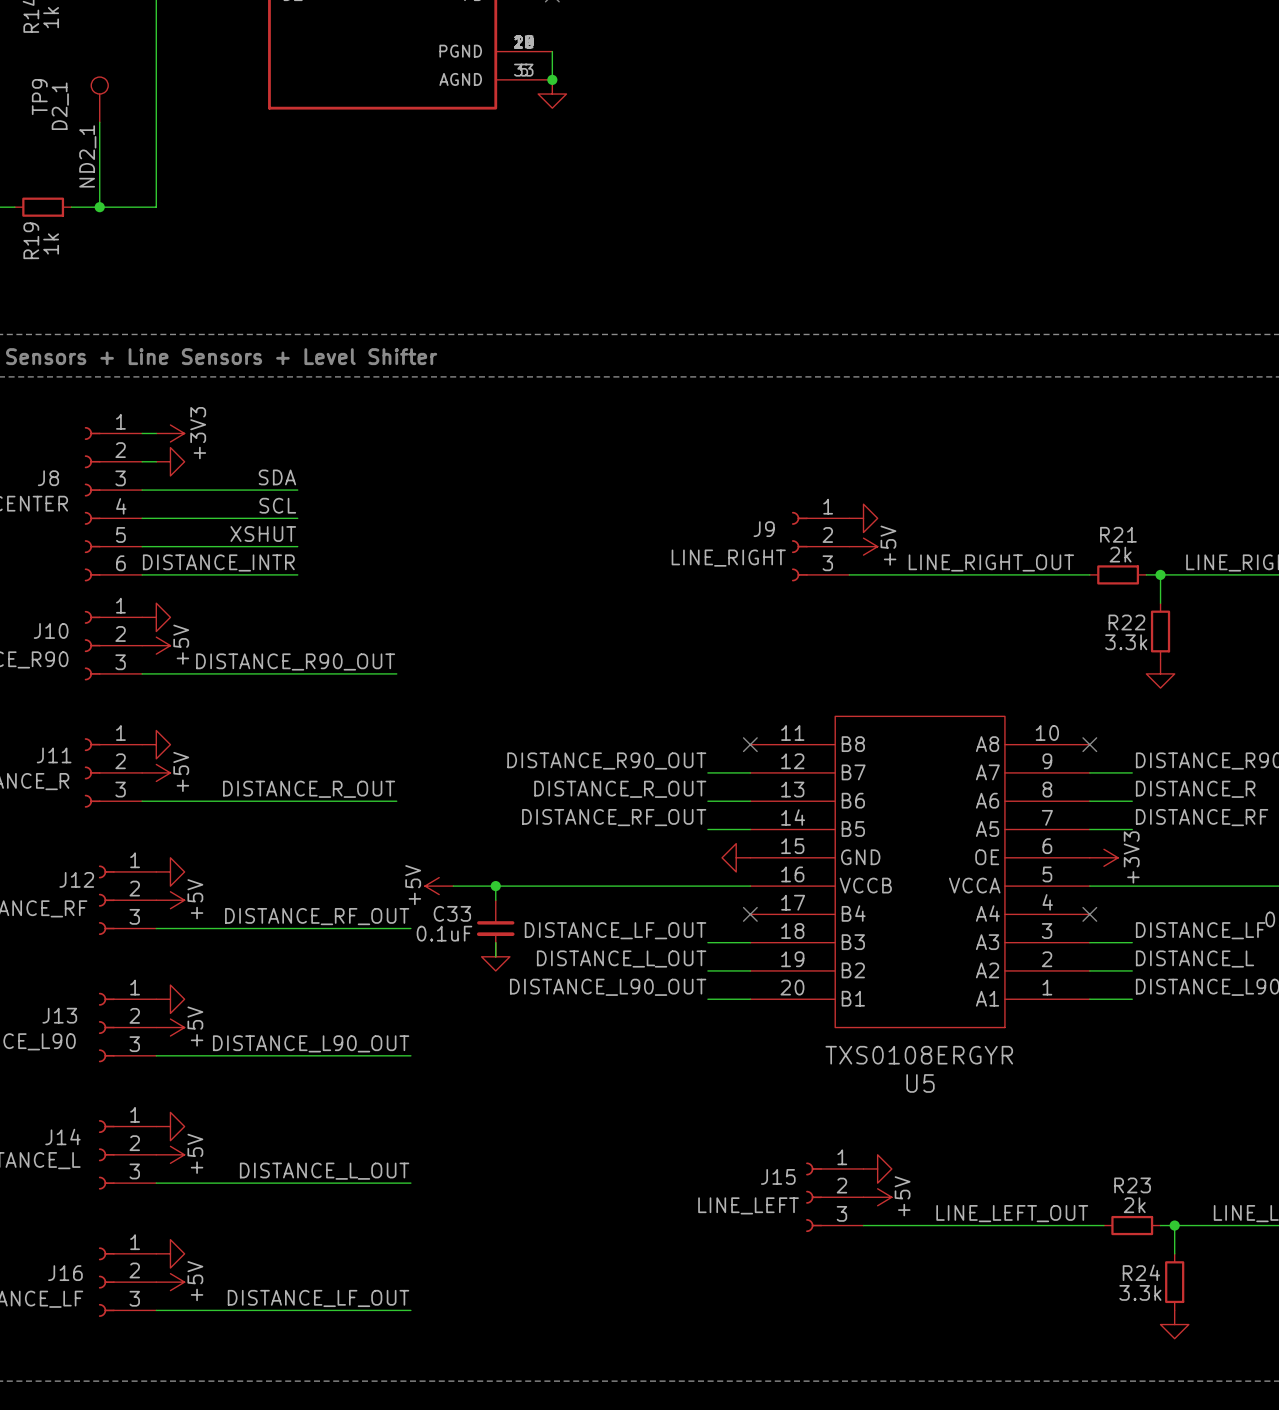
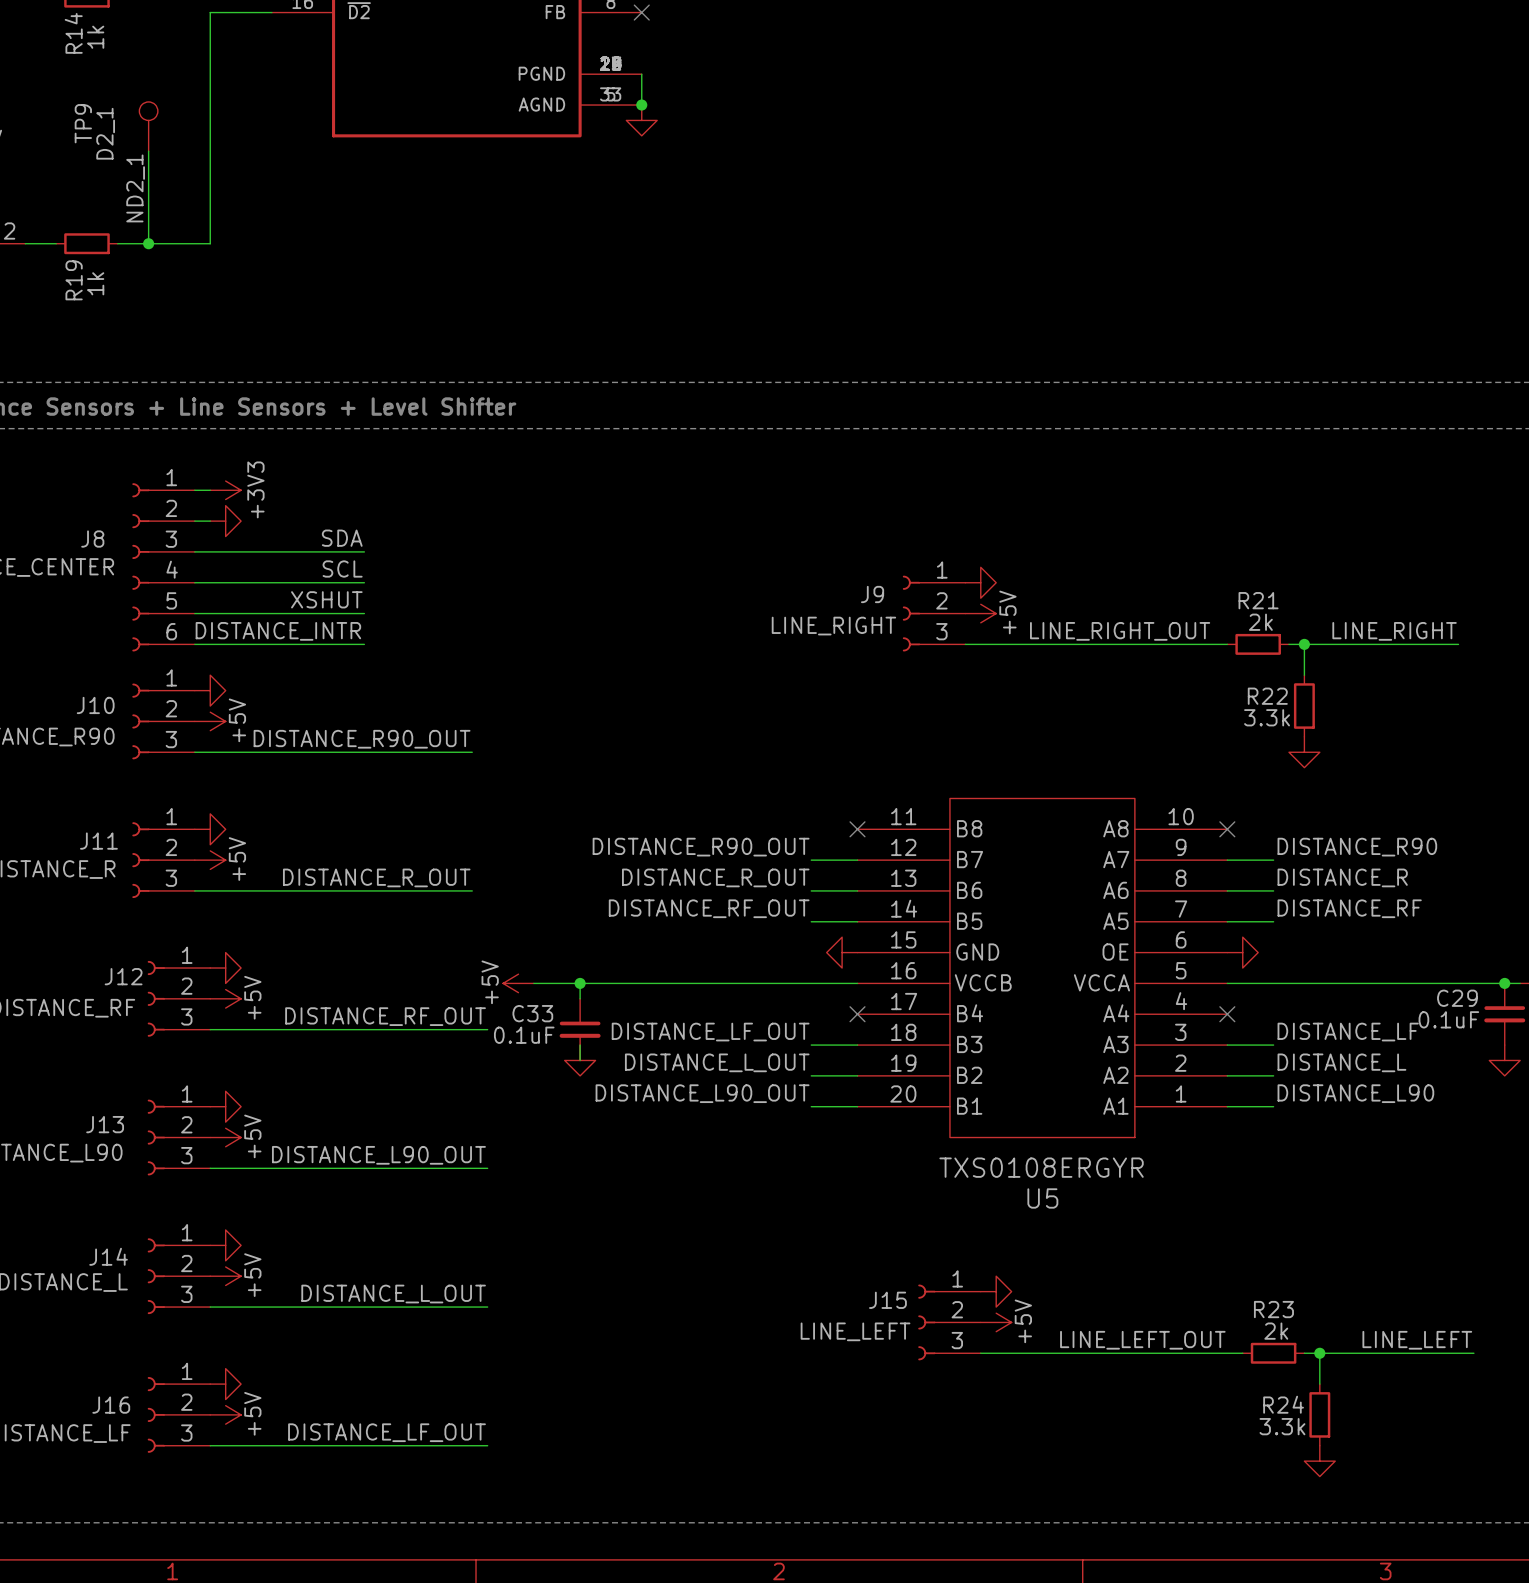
power symbol shape: [1089, 849, 1119, 867] -> [1227, 937, 1259, 969]
power symbol text: +3V3 (1131, 857) -> none

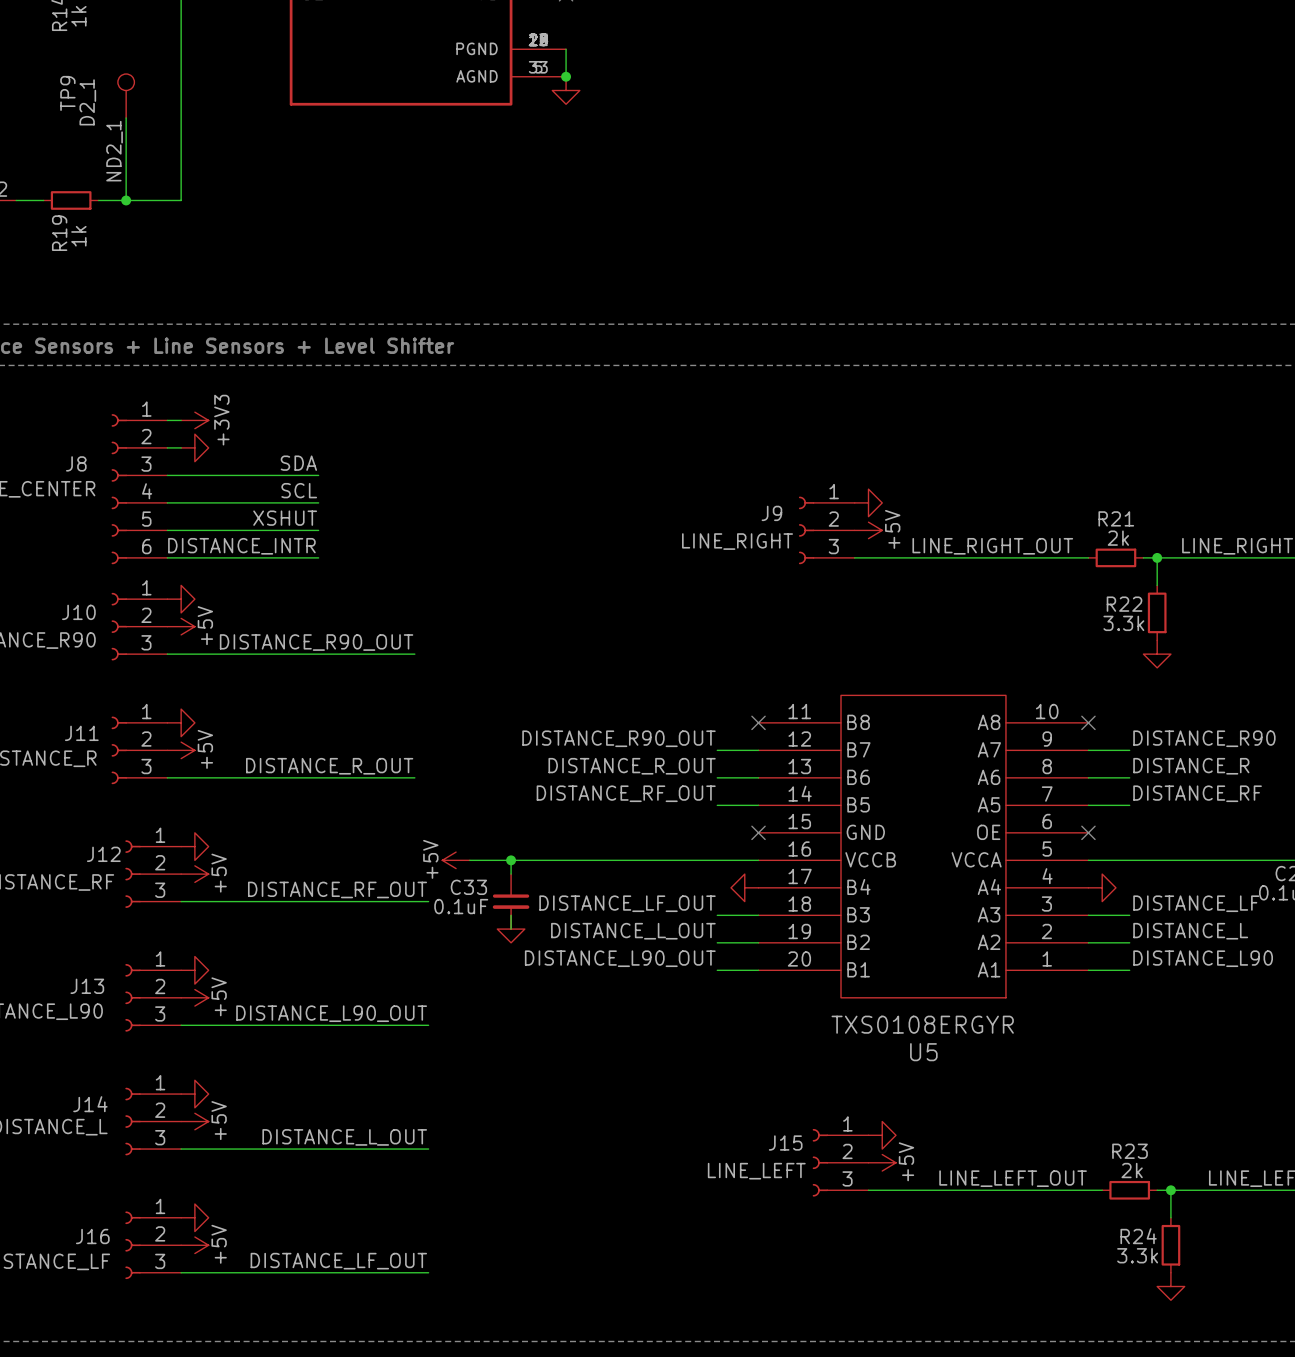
power symbol position: (842, 952) -> (744, 887)
power symbol position: (1242, 952) -> (1102, 887)
no-connect mark position: (857, 1014) -> (758, 832)
no-connect mark position: (1227, 1014) -> (1088, 832)

